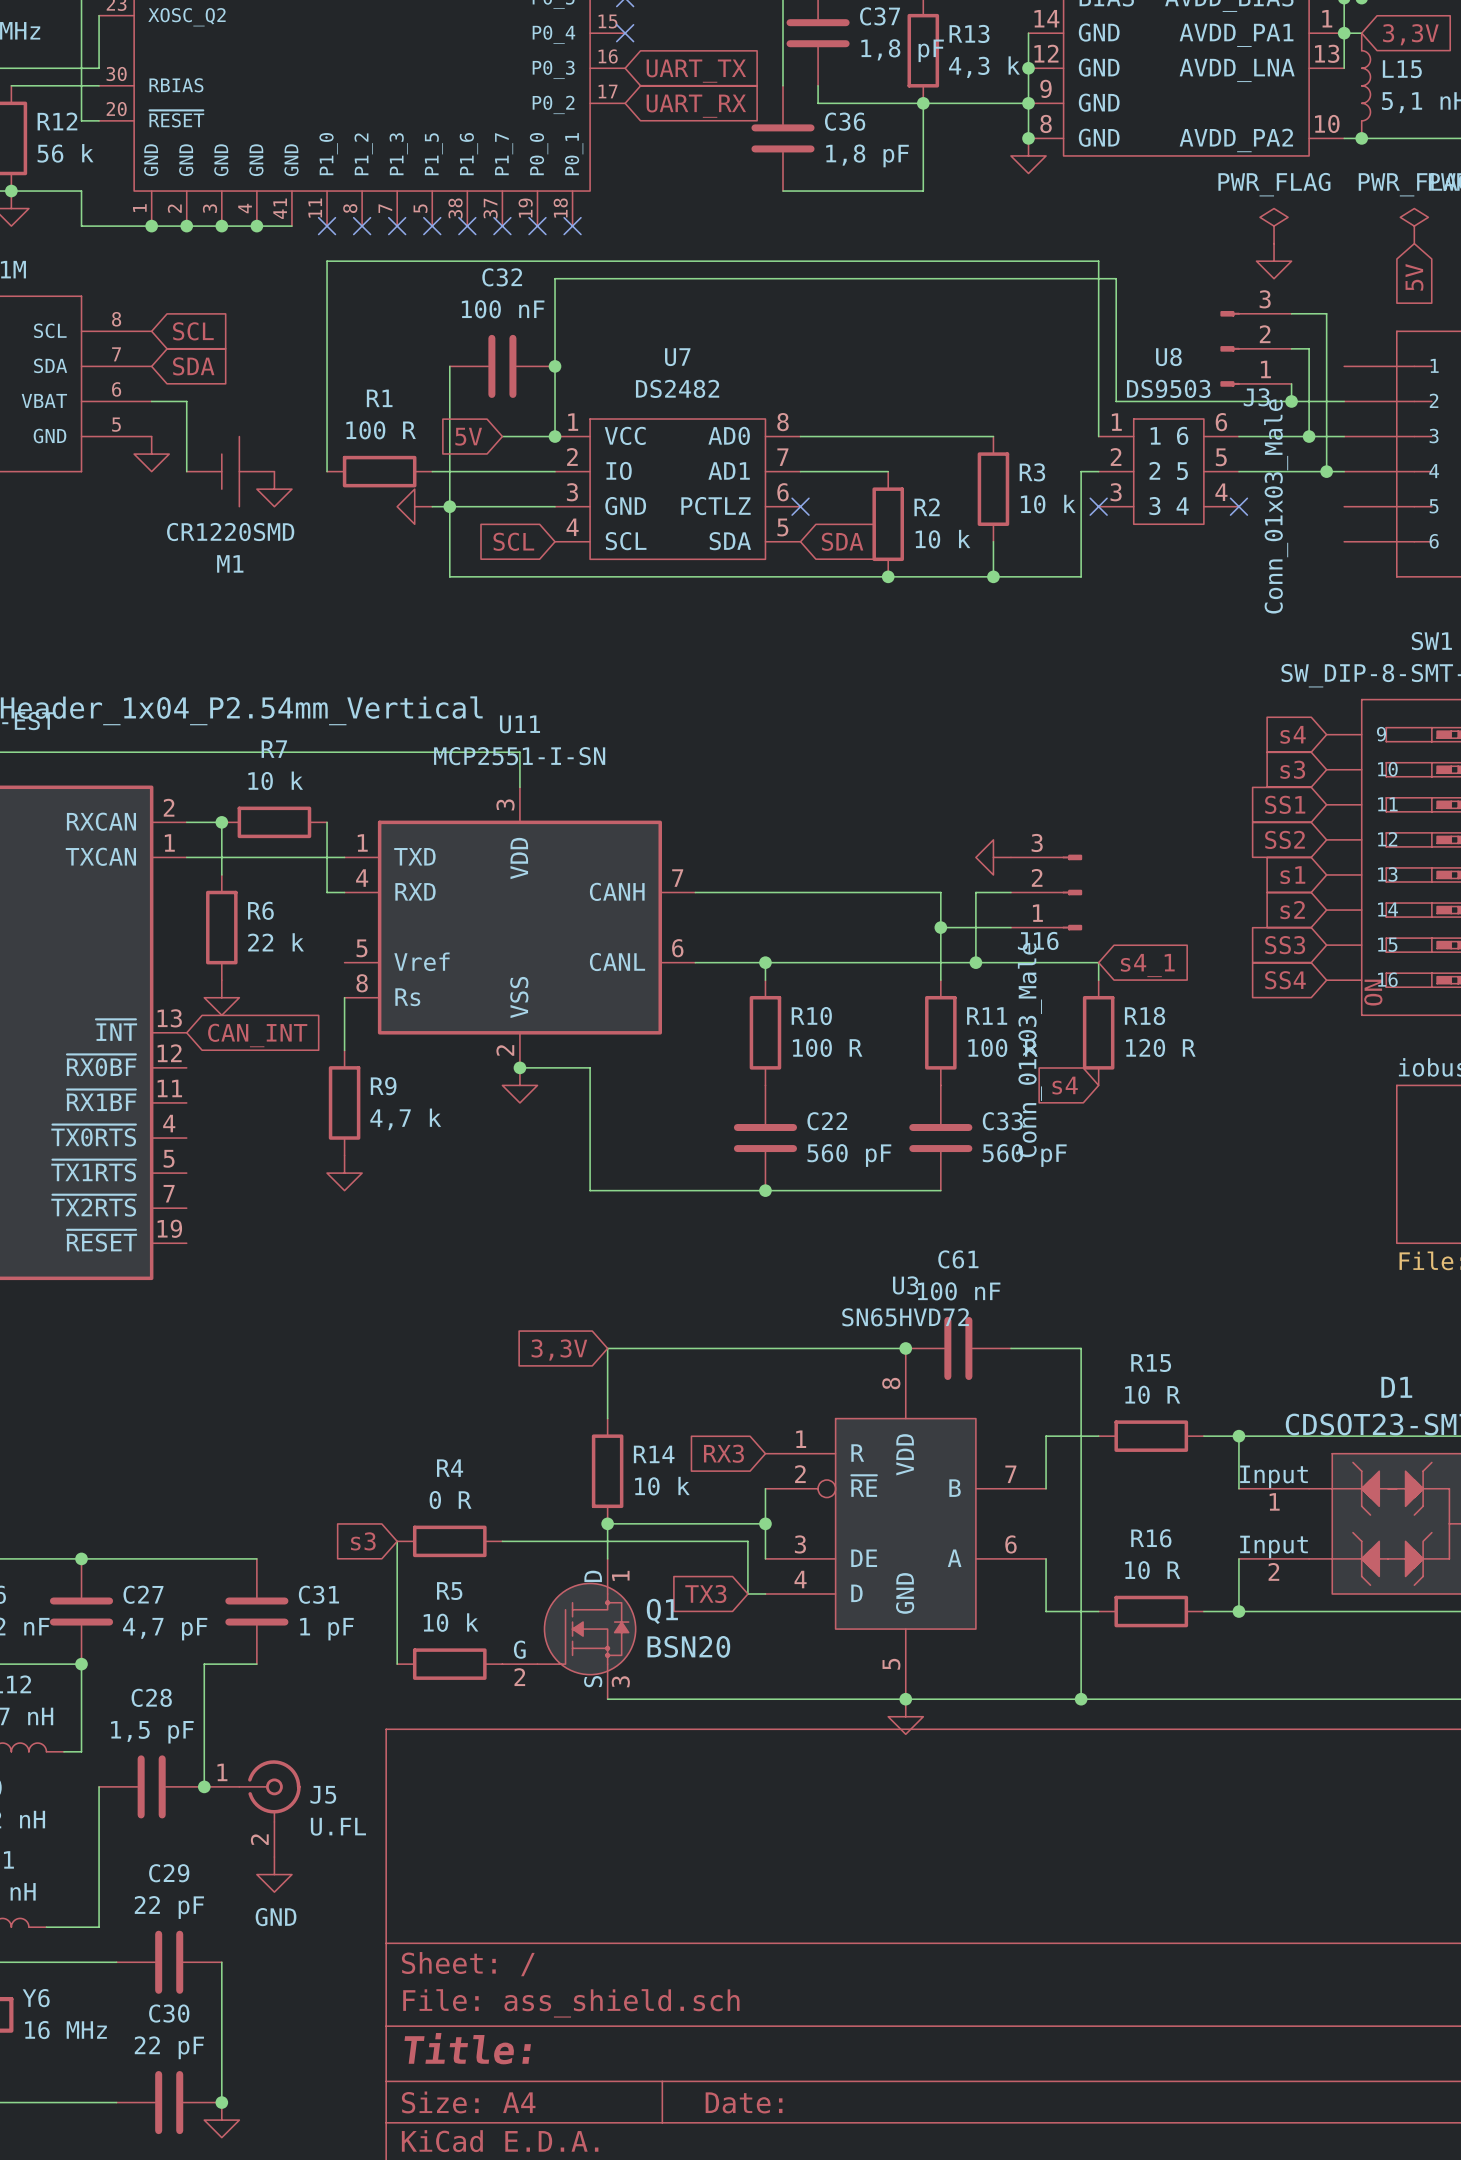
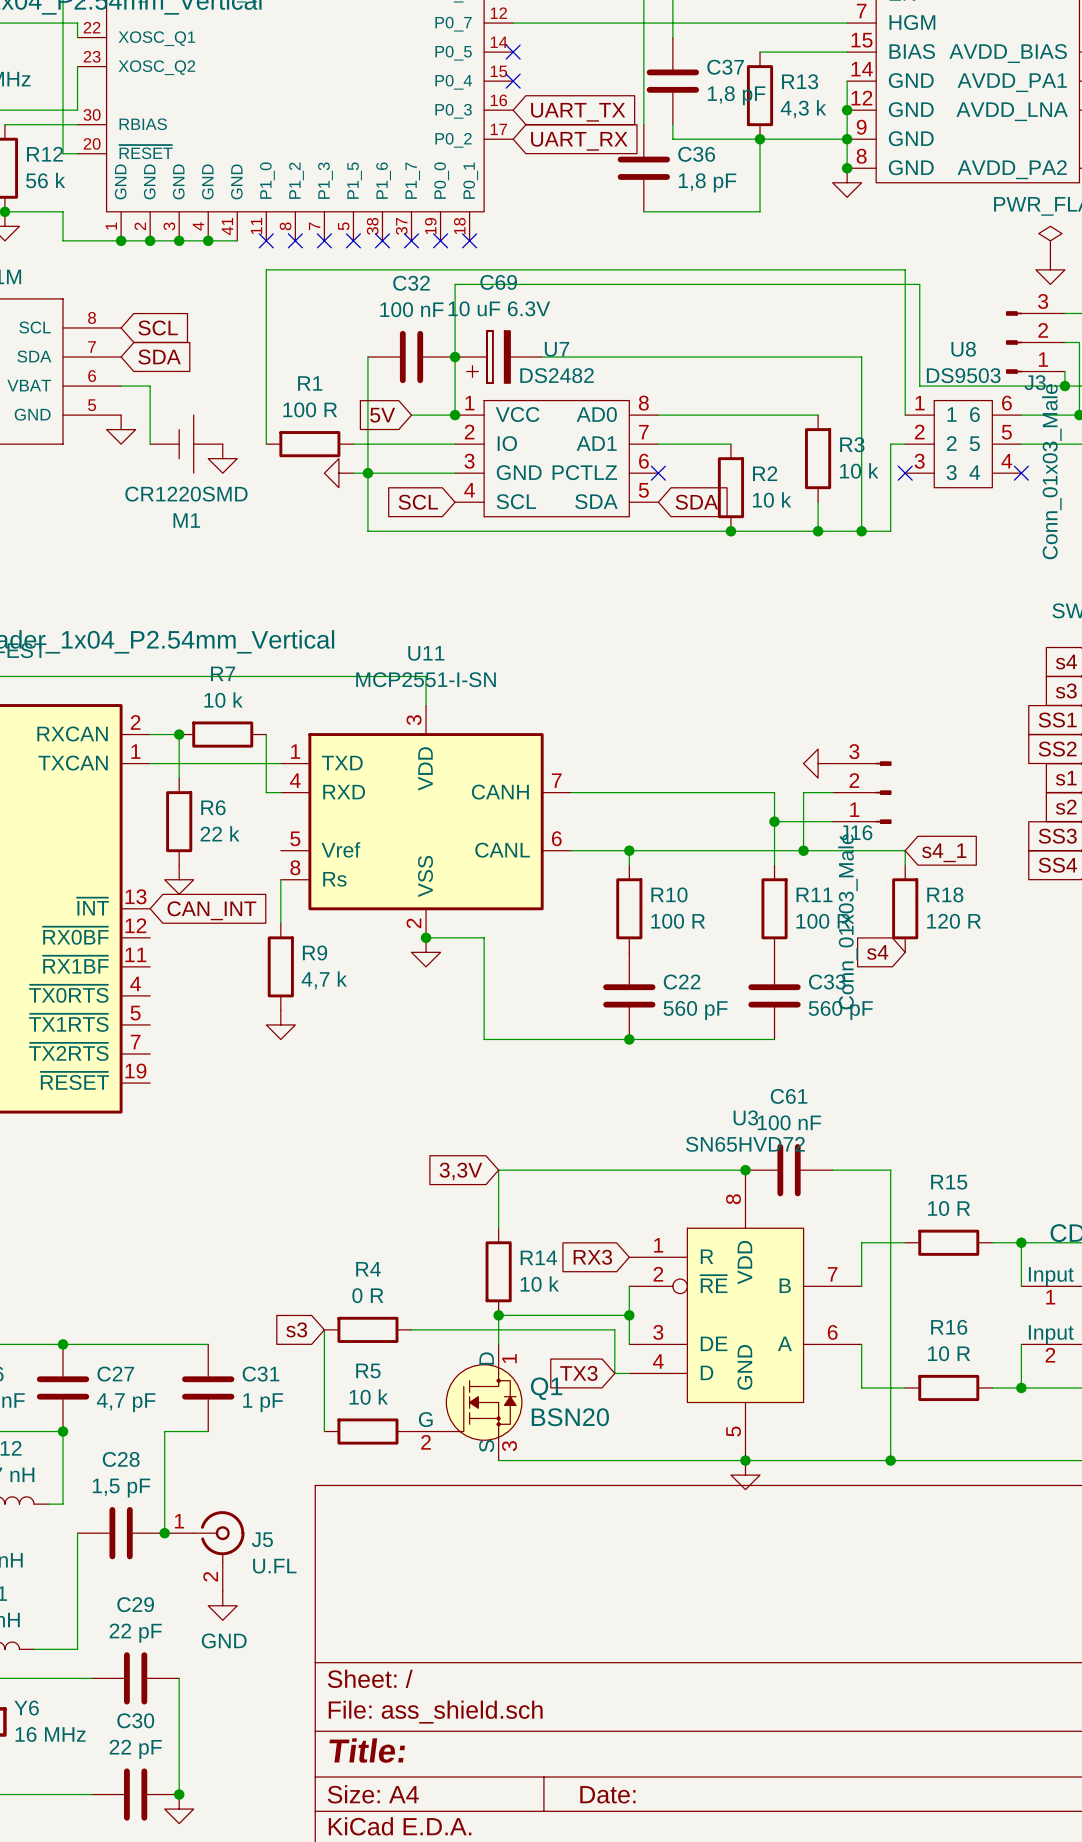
C69: none -> 10 uF 6.3V (498, 357)
wire: none -> (542, 357) (861, 357) (861, 531)
junction: none -> (861, 531)

